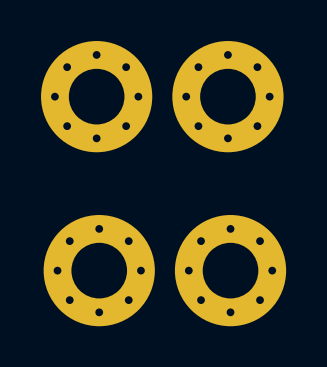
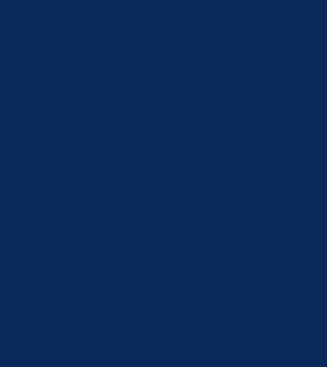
part: (96, 96) -> none
part: (227, 96) -> none
part: (99, 270) -> none
part: (230, 270) -> none

